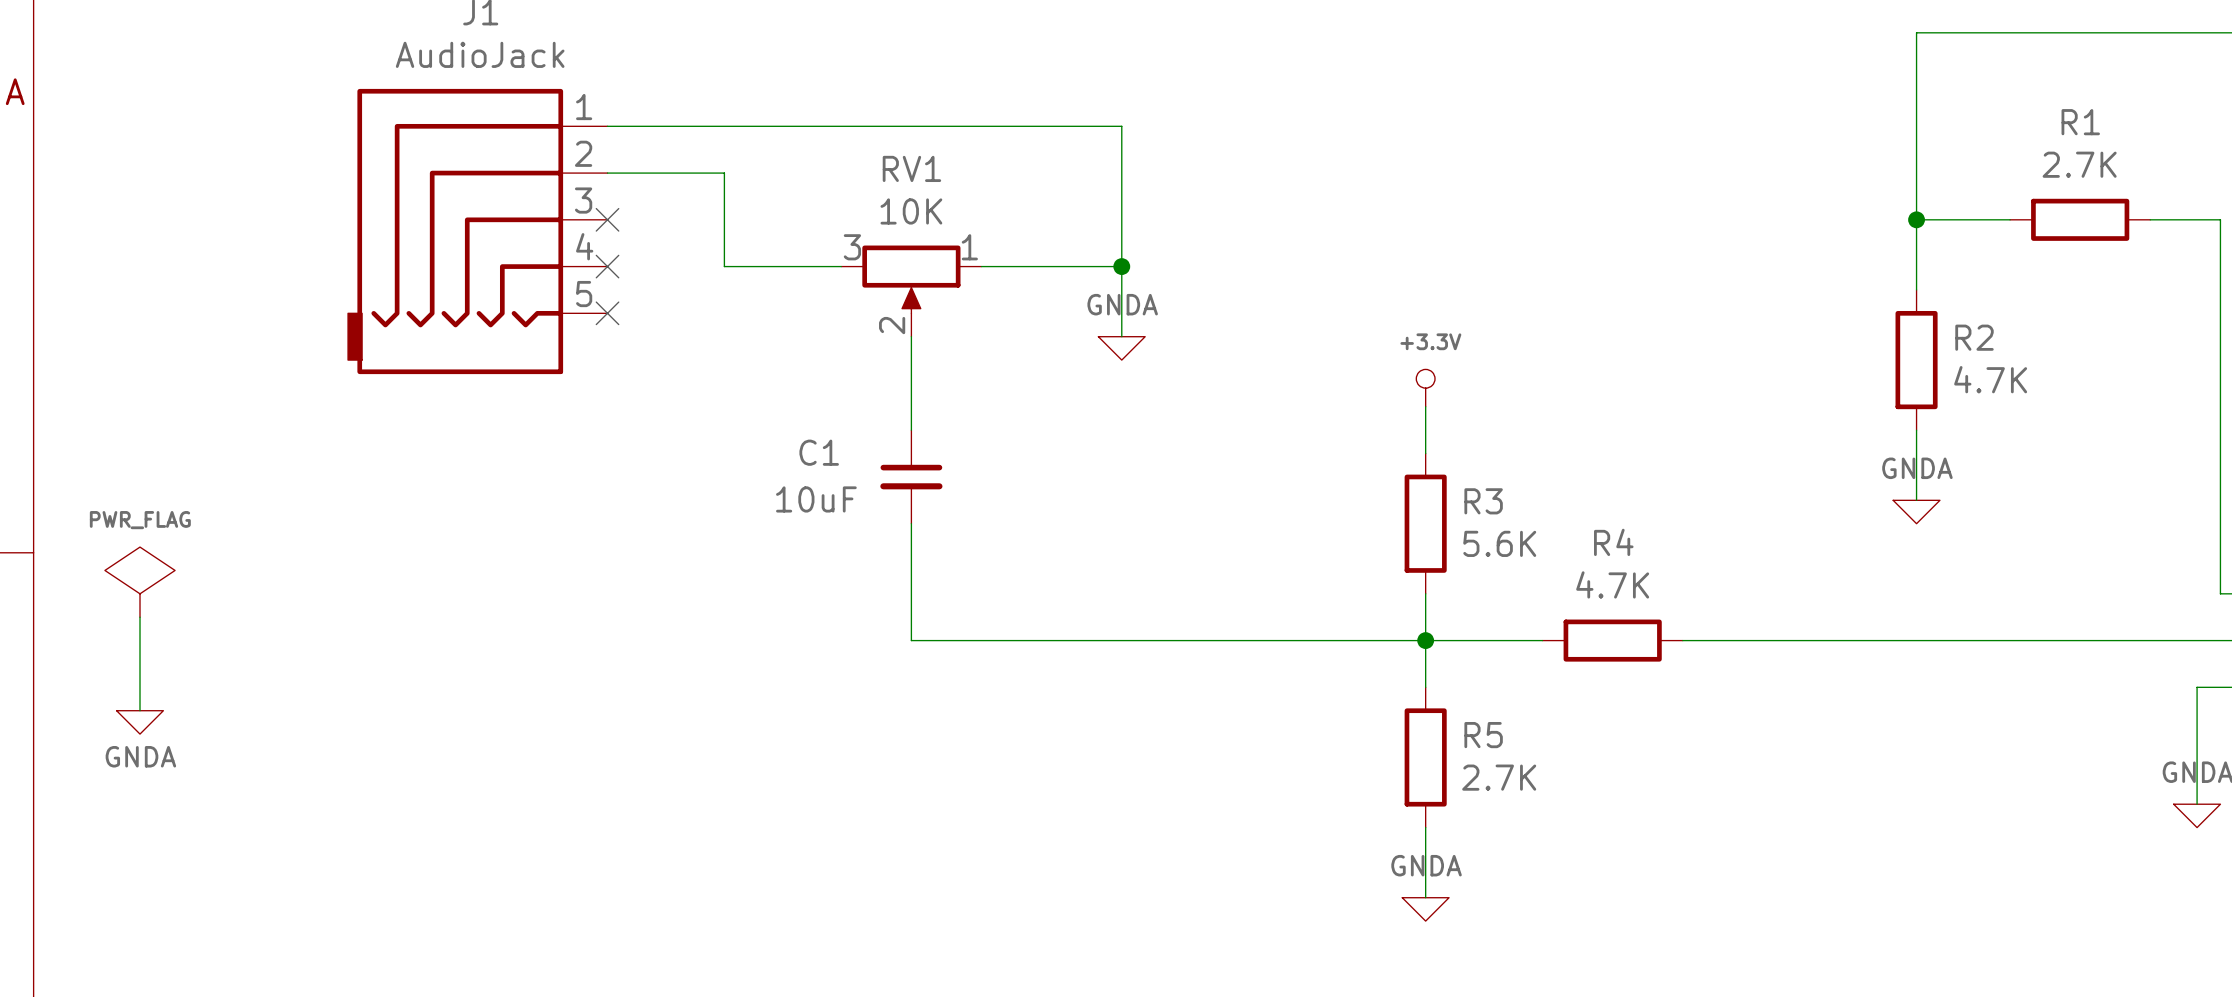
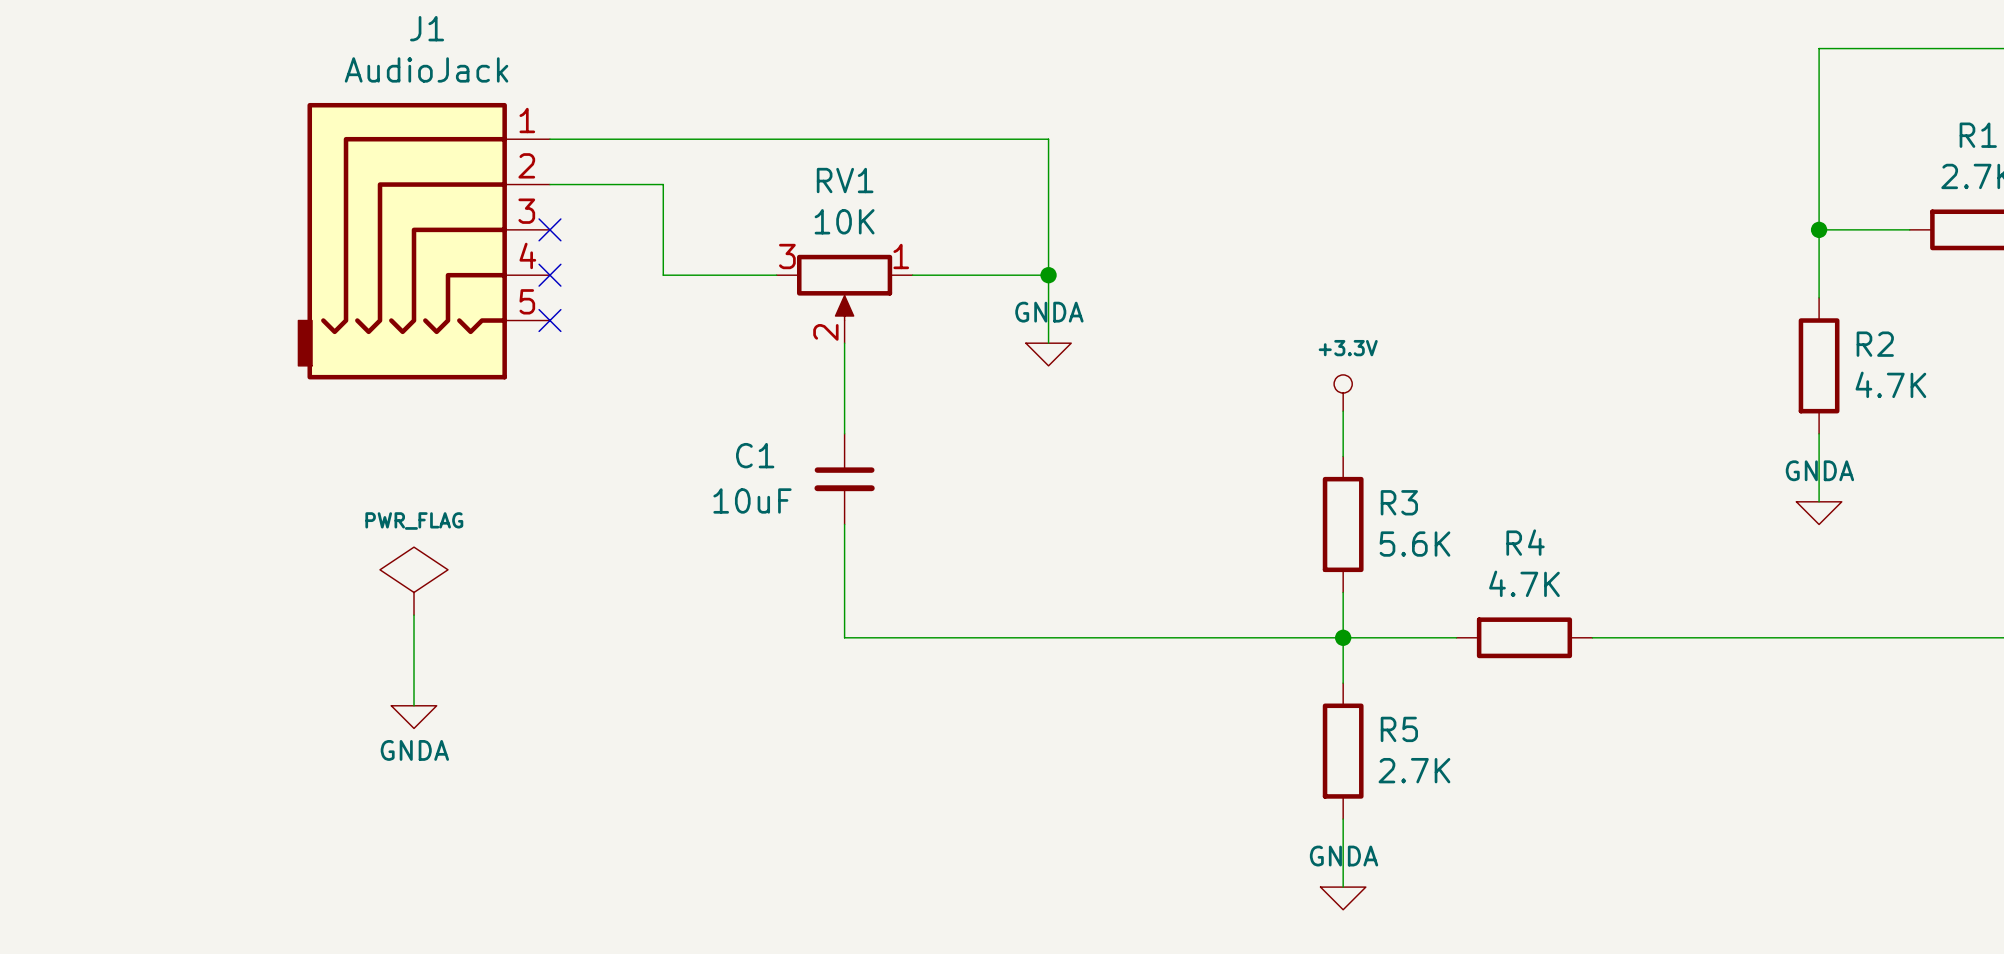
power symbol position: PWR_FLAG (140, 582) -> PWR_FLAG (414, 581)
wire: (140, 617) (140, 710) -> (414, 615) (414, 705)
power symbol position: GNDA (140, 722) -> GNDA (414, 717)

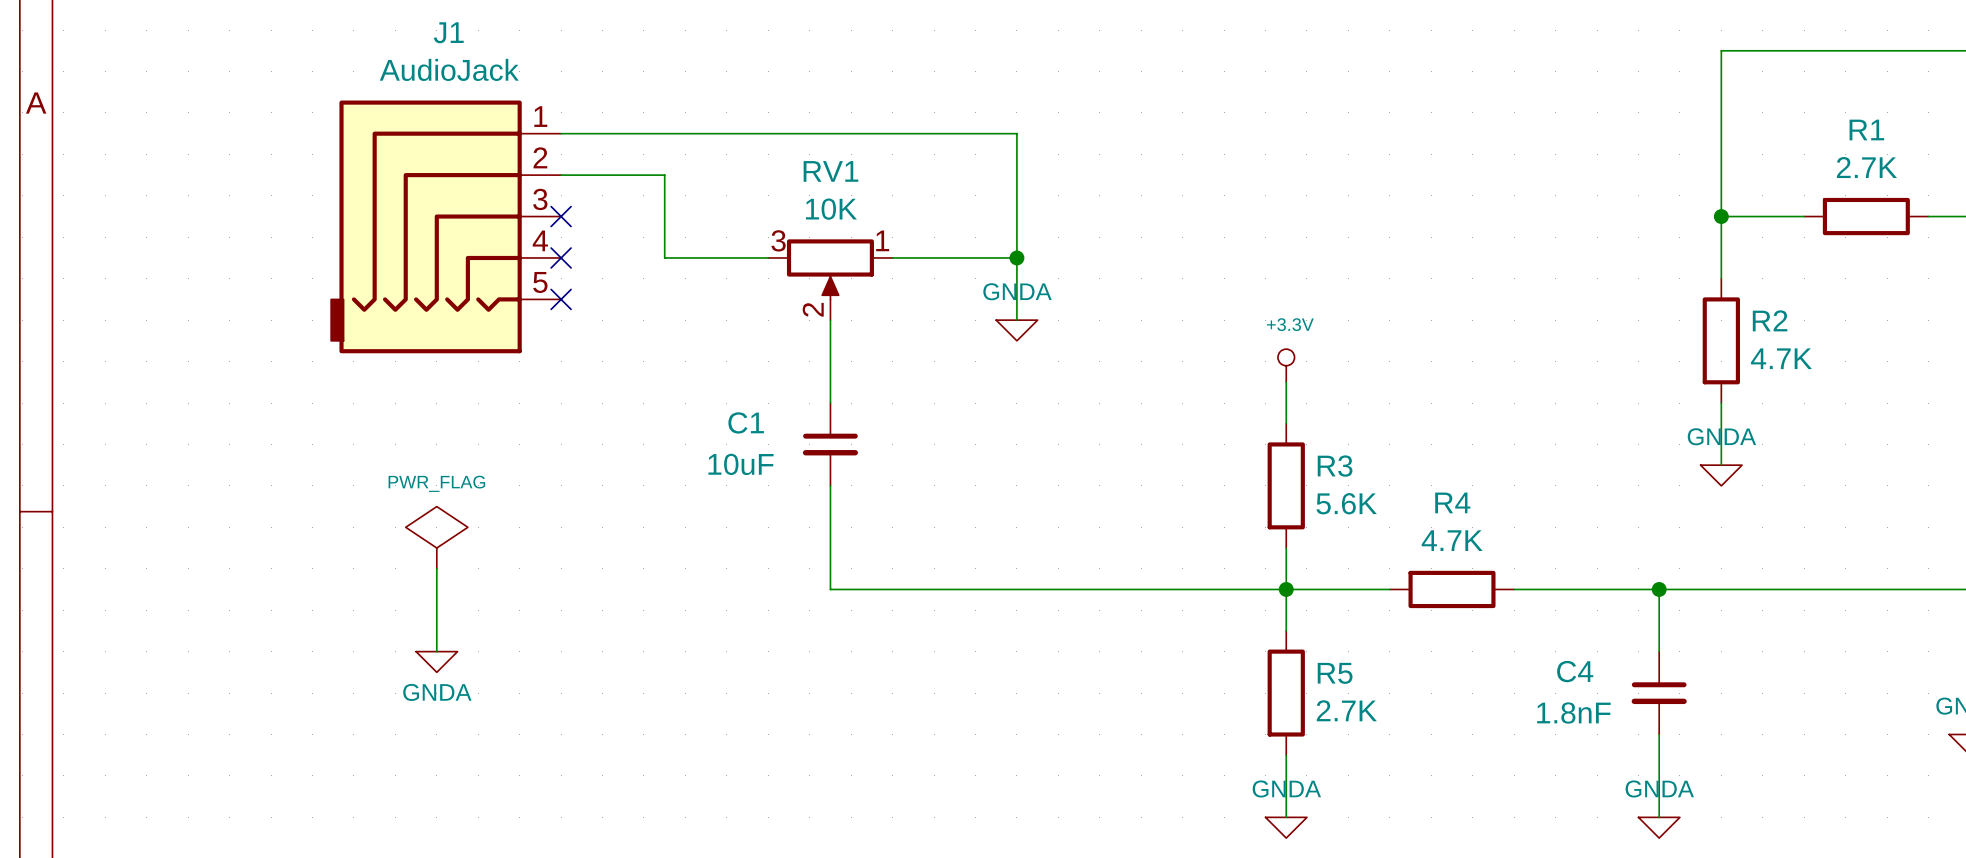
wire: none -> (1659, 589) (1659, 651)
junction: none -> (1659, 589)
C4: none -> 1.8nF (1659, 693)
wire: none -> (1659, 734) (1659, 817)
power symbol: none -> GNDA (1659, 827)

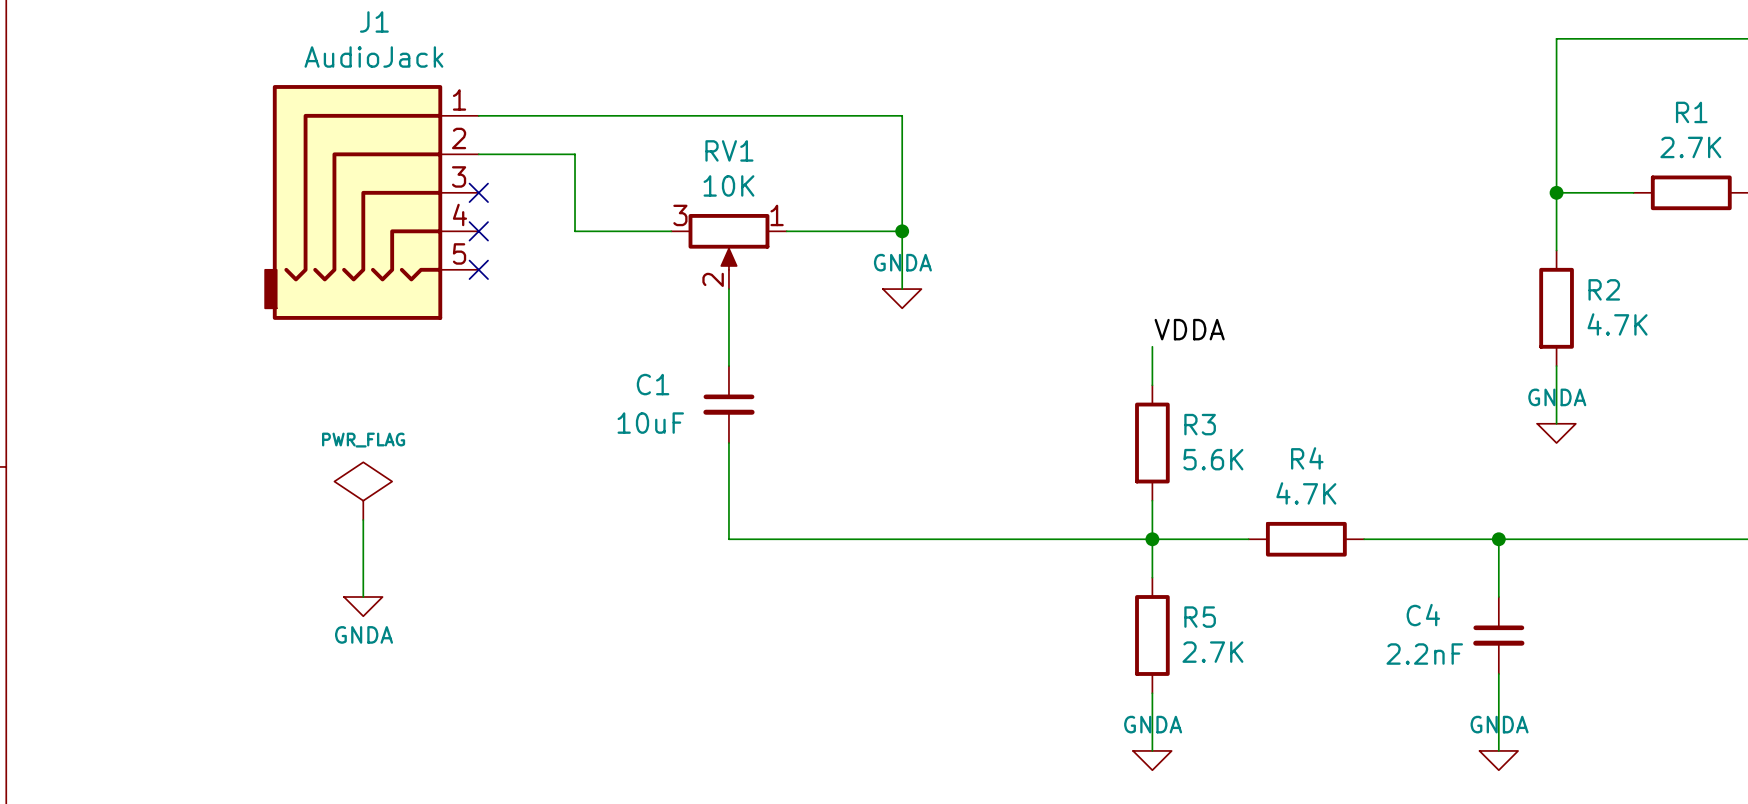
label: none -> VDDA (1189, 329)
power symbol: +3.3V (1286, 365) -> none
C4 value: 1.8nF (1573, 713) -> 2.2nF (1424, 654)

